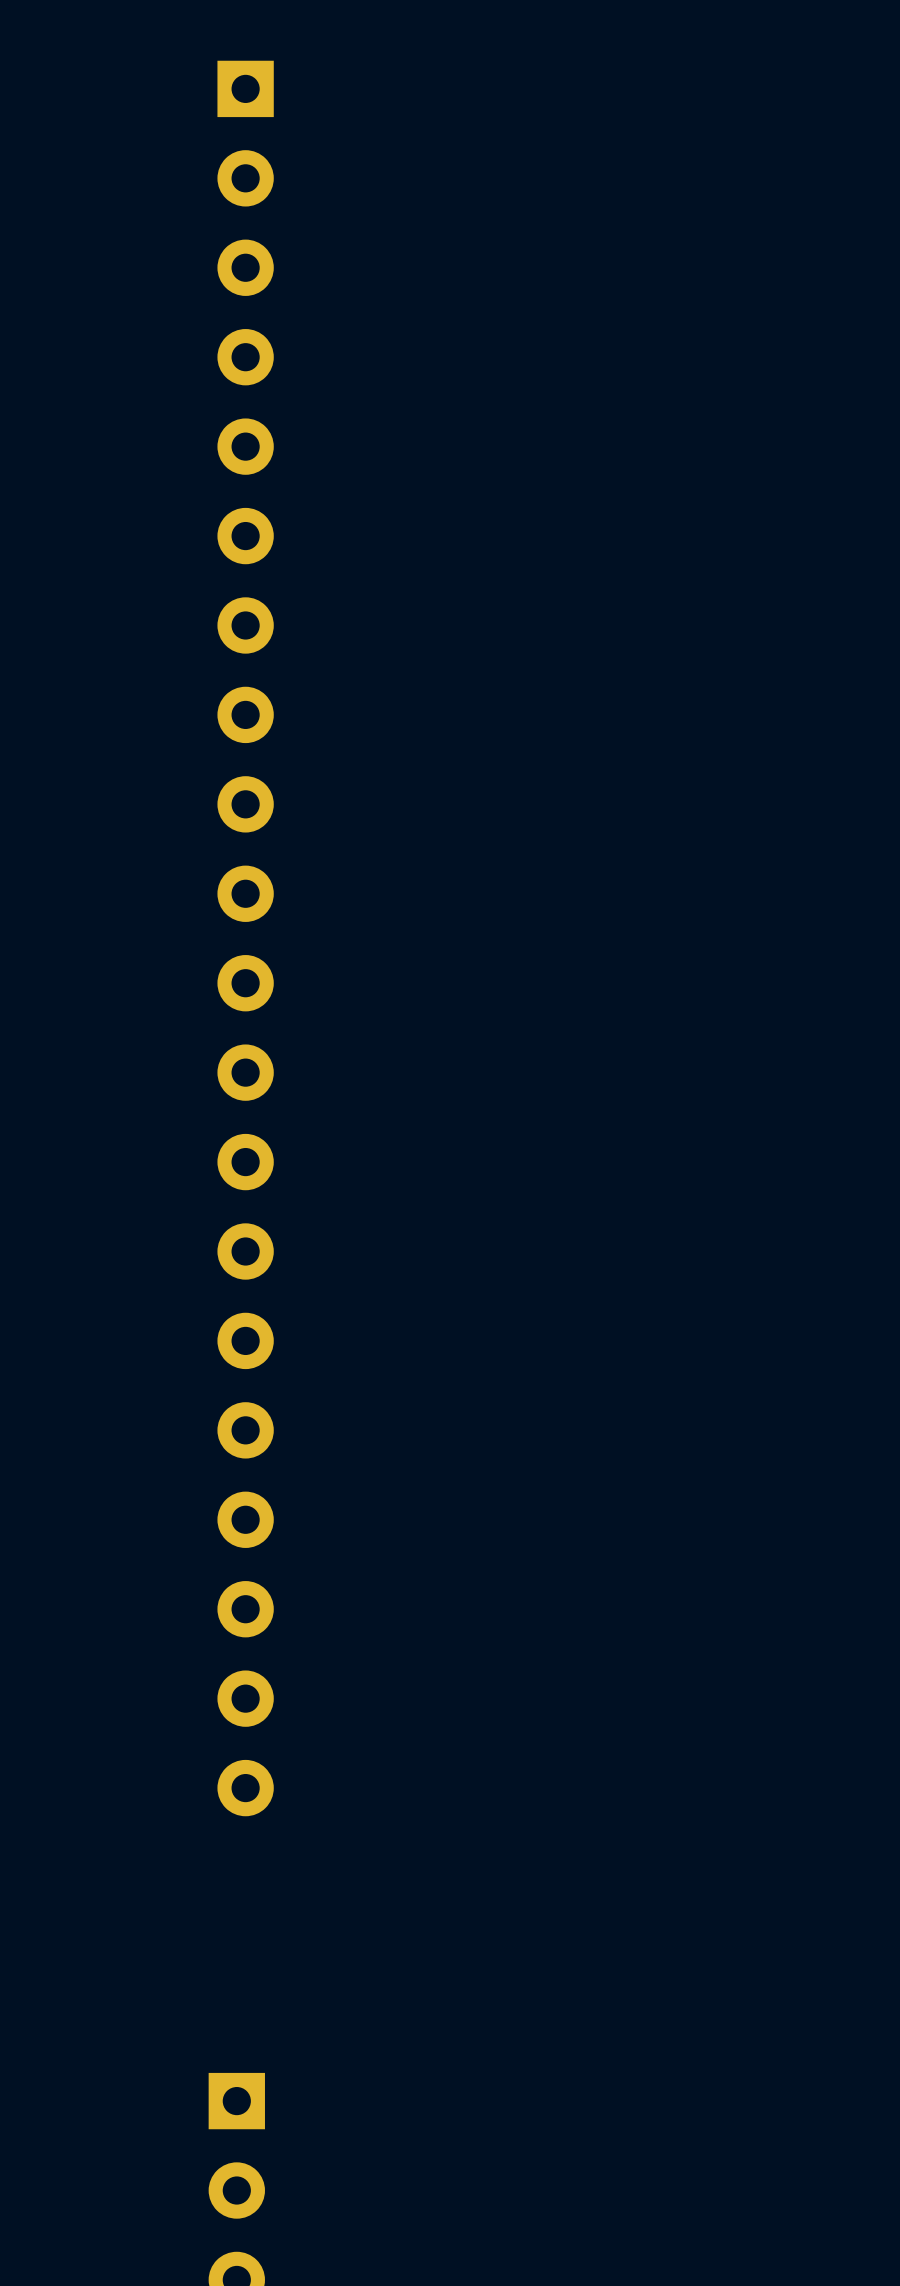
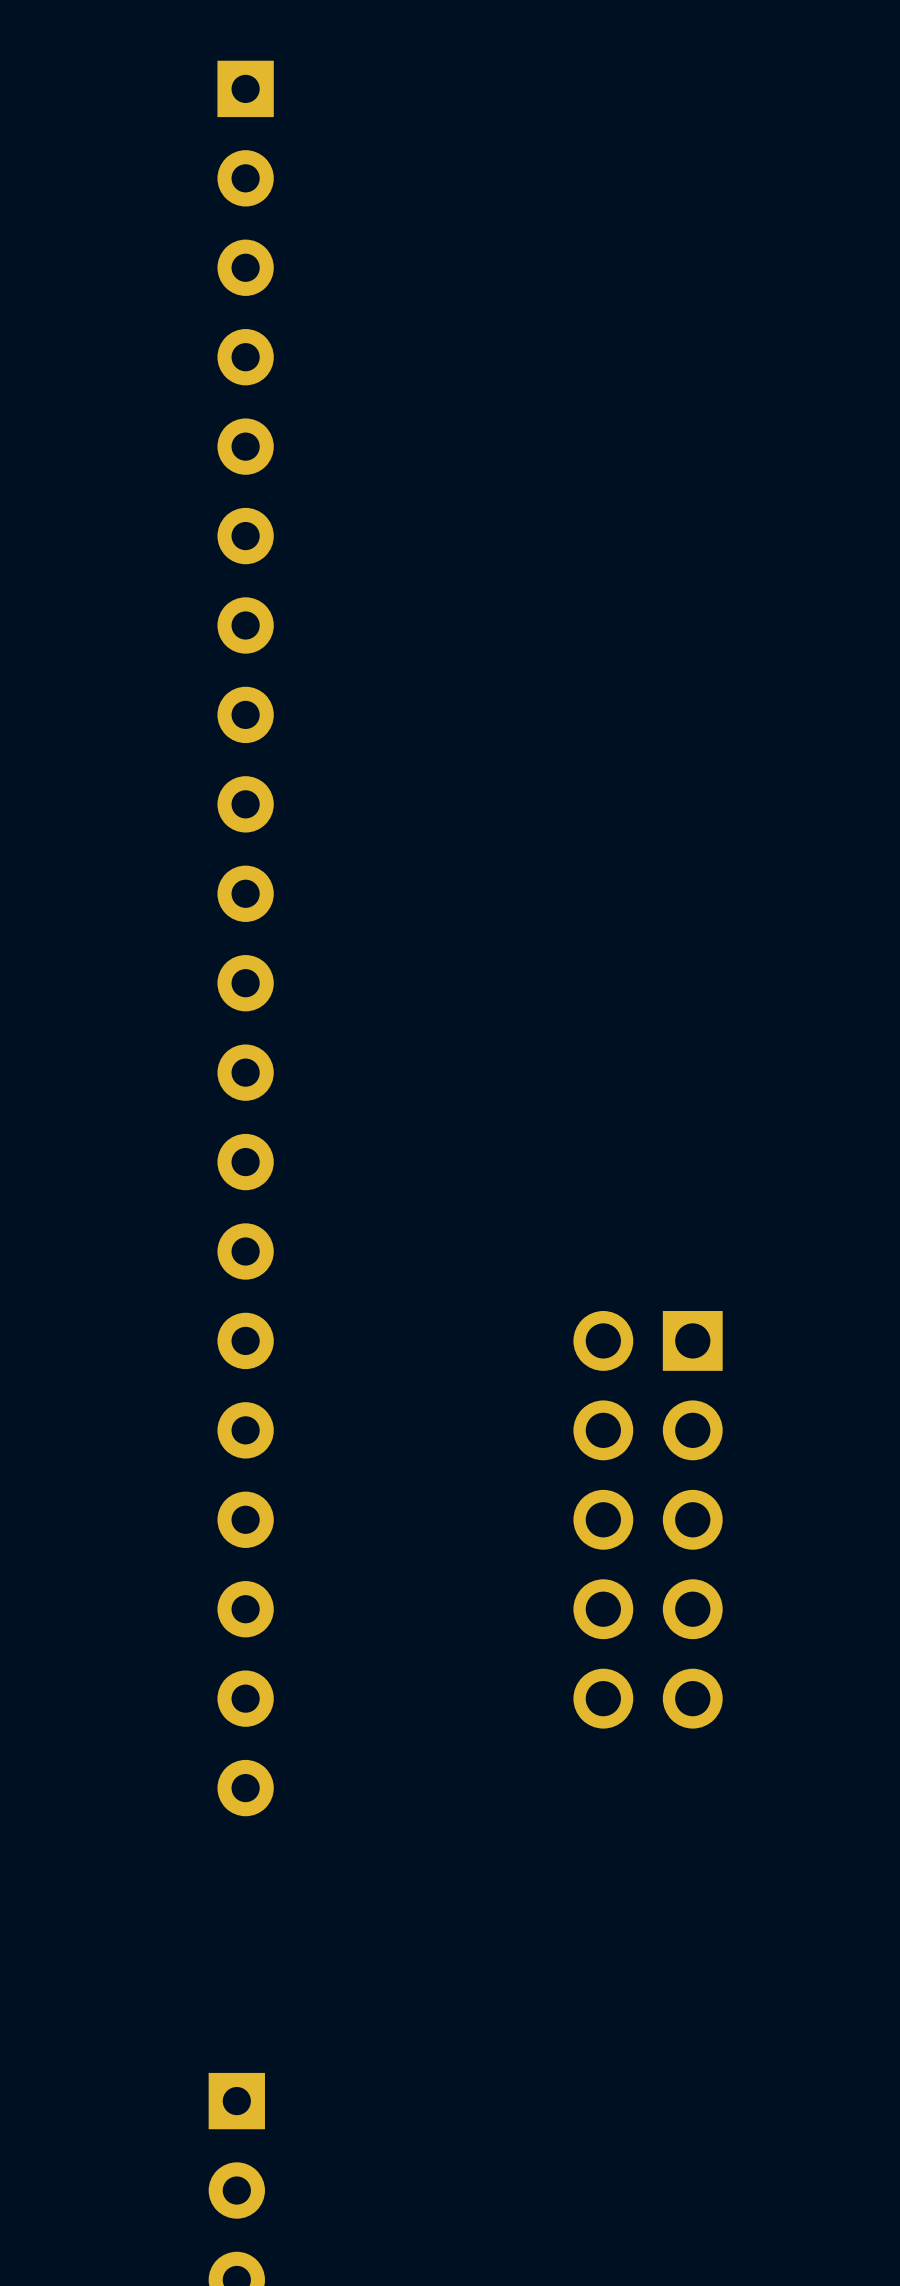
part: none -> (648, 1519)

